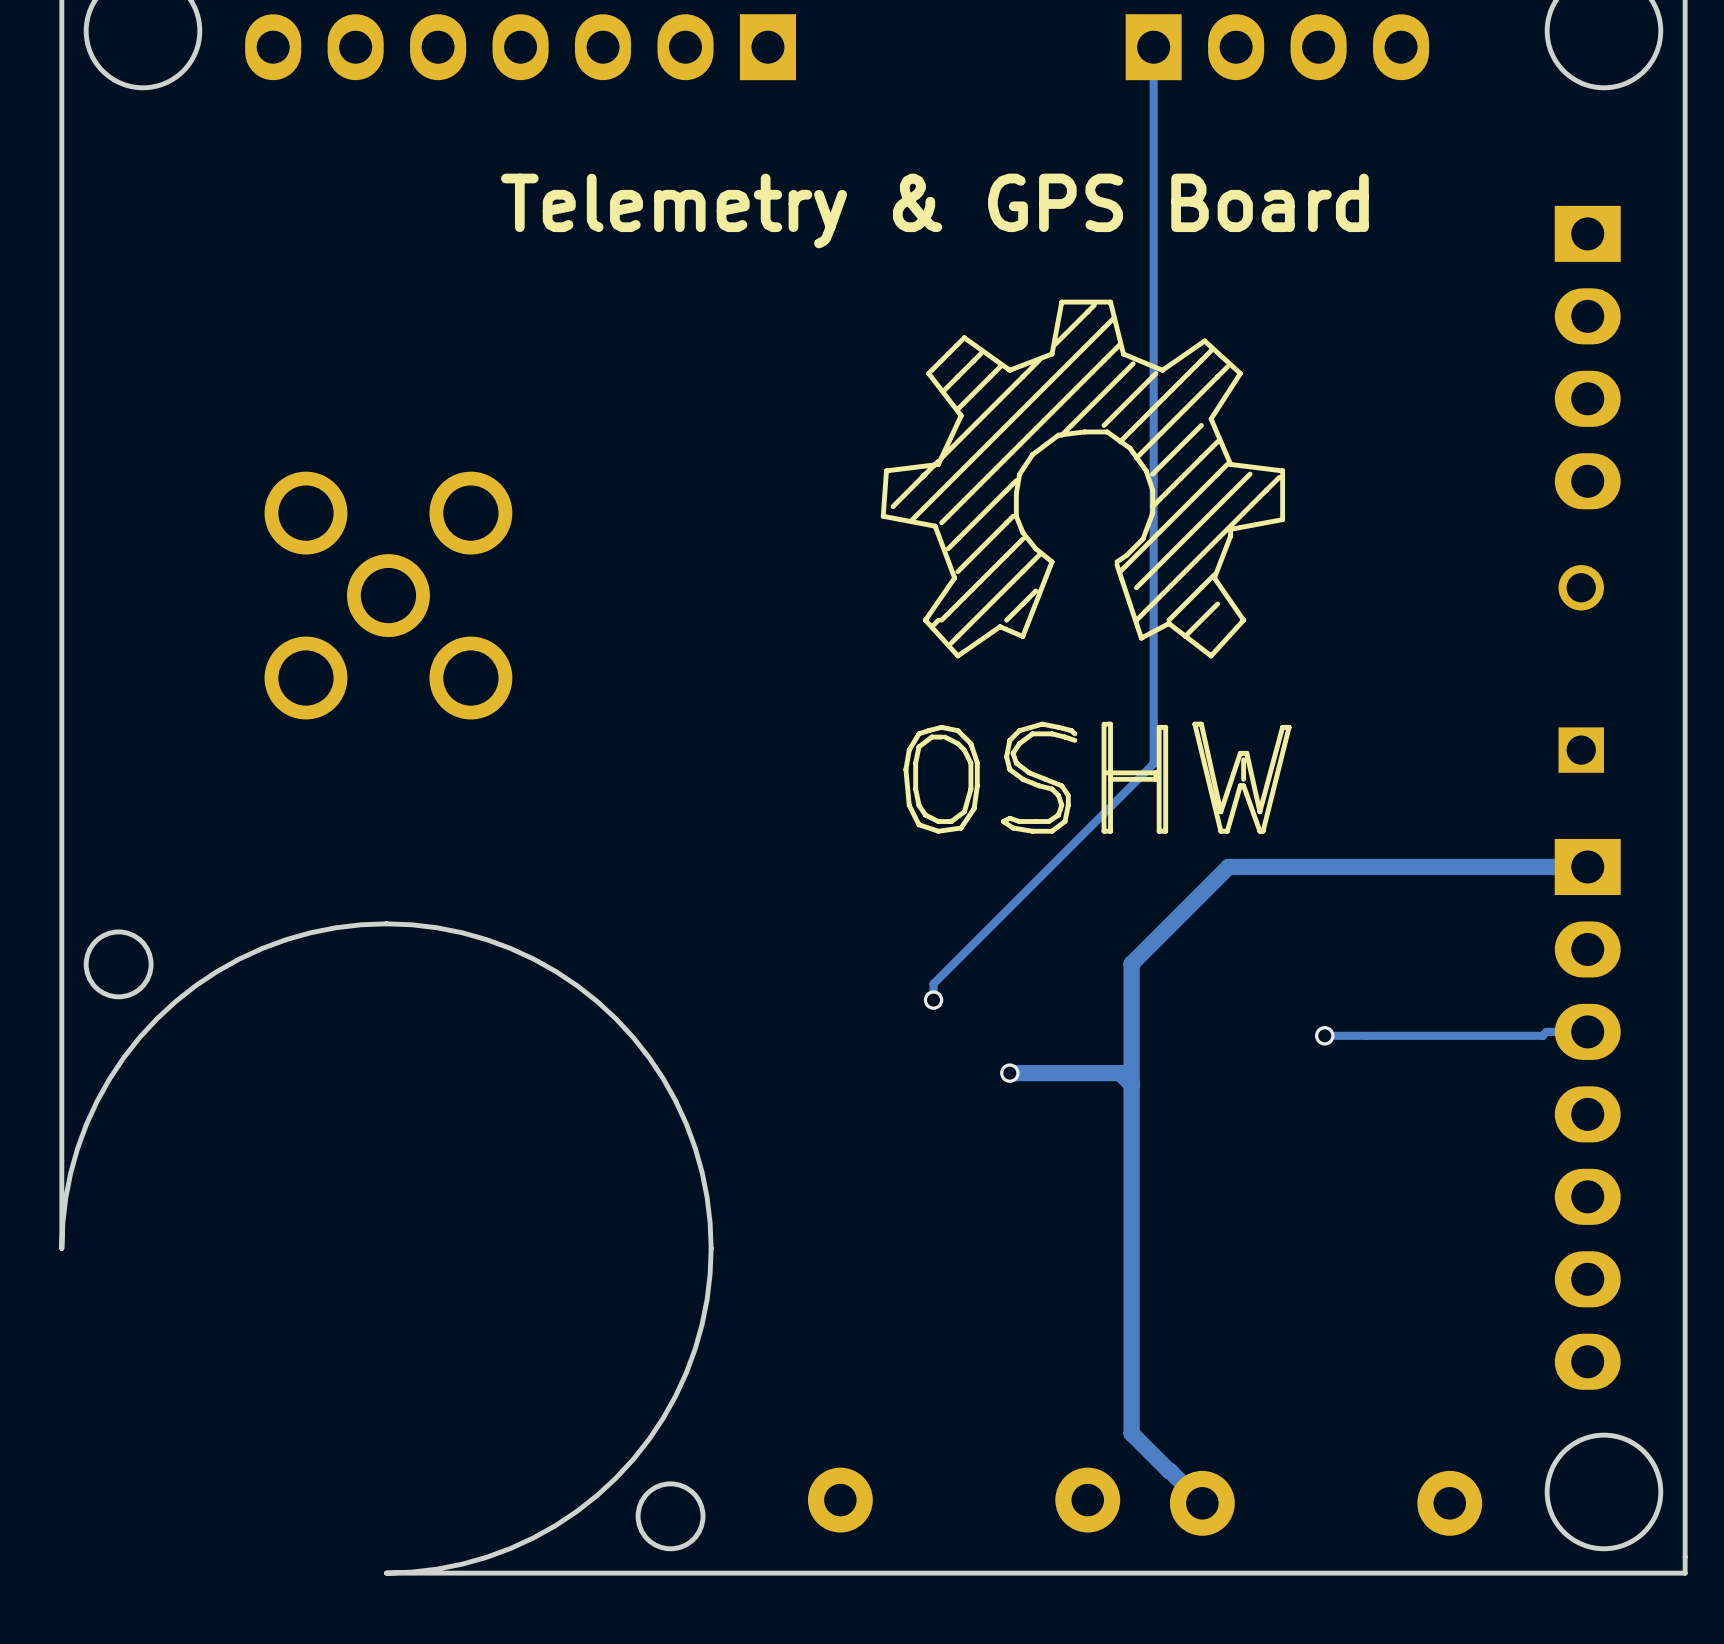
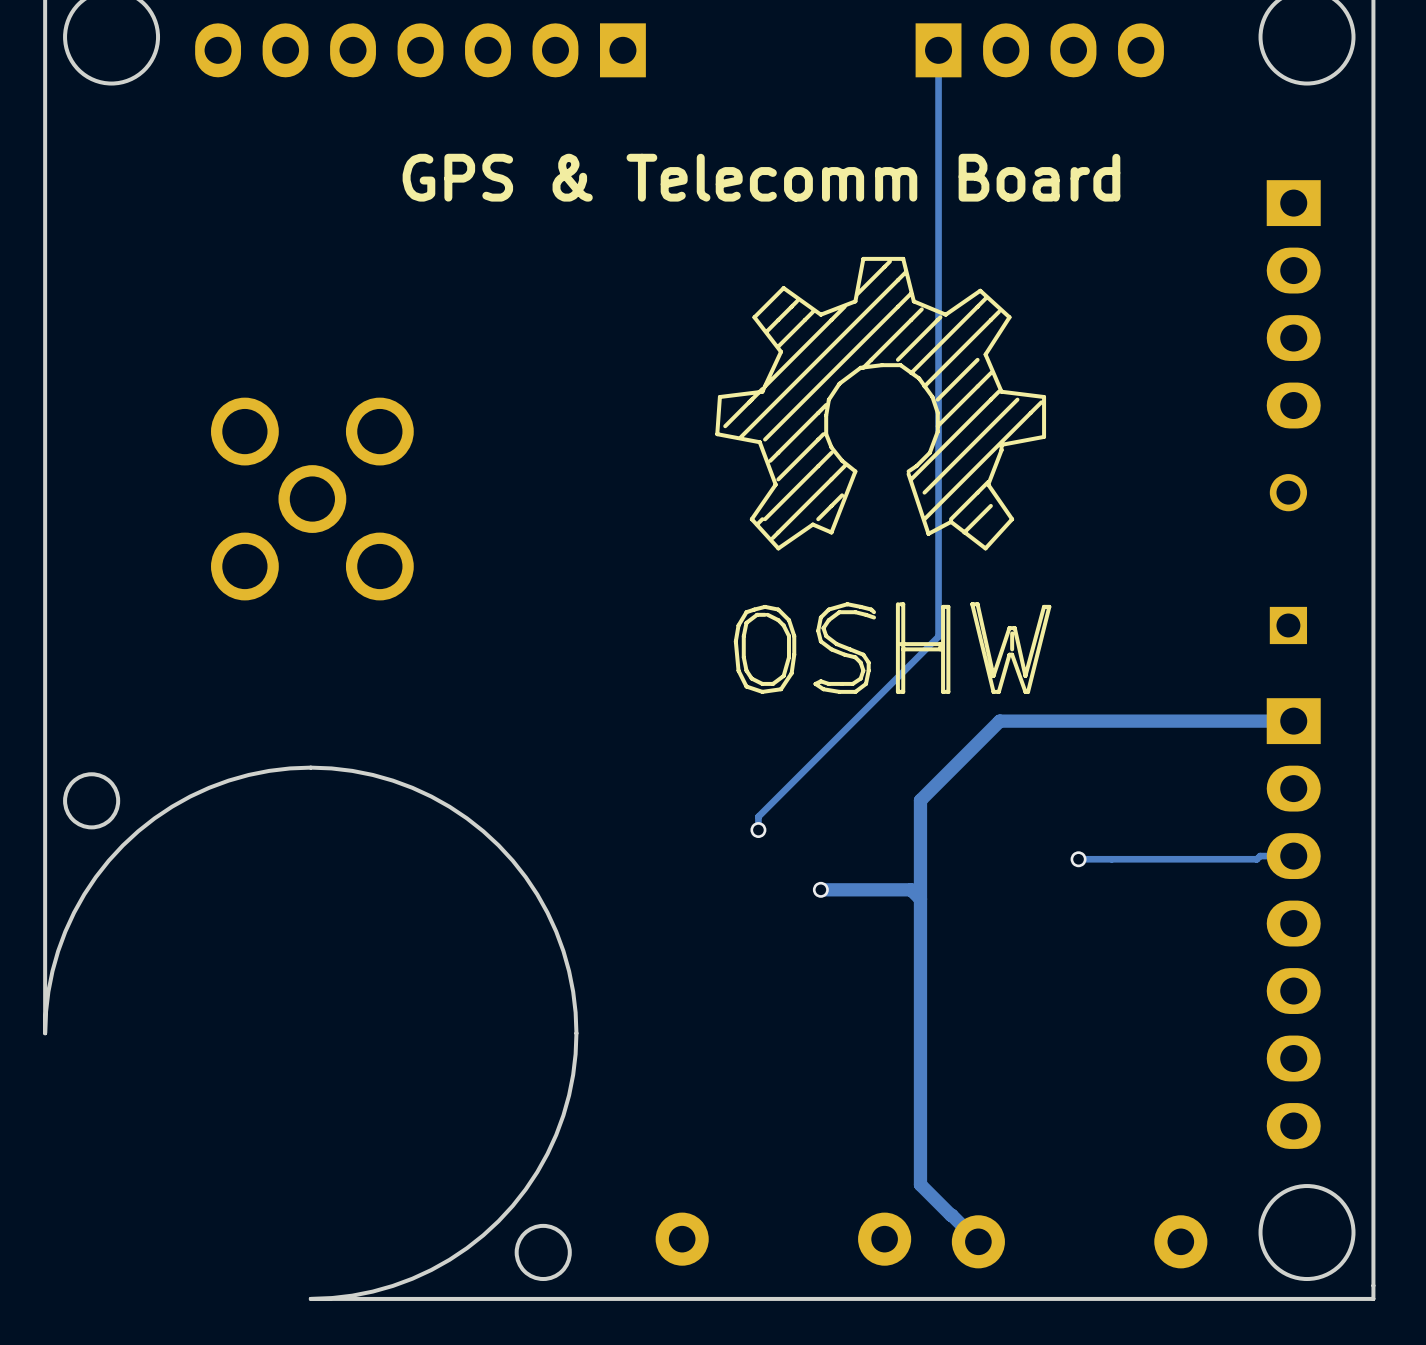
text: Telemetry & GPS Board (934, 210) -> GPS & Telecomm Board (761, 177)

